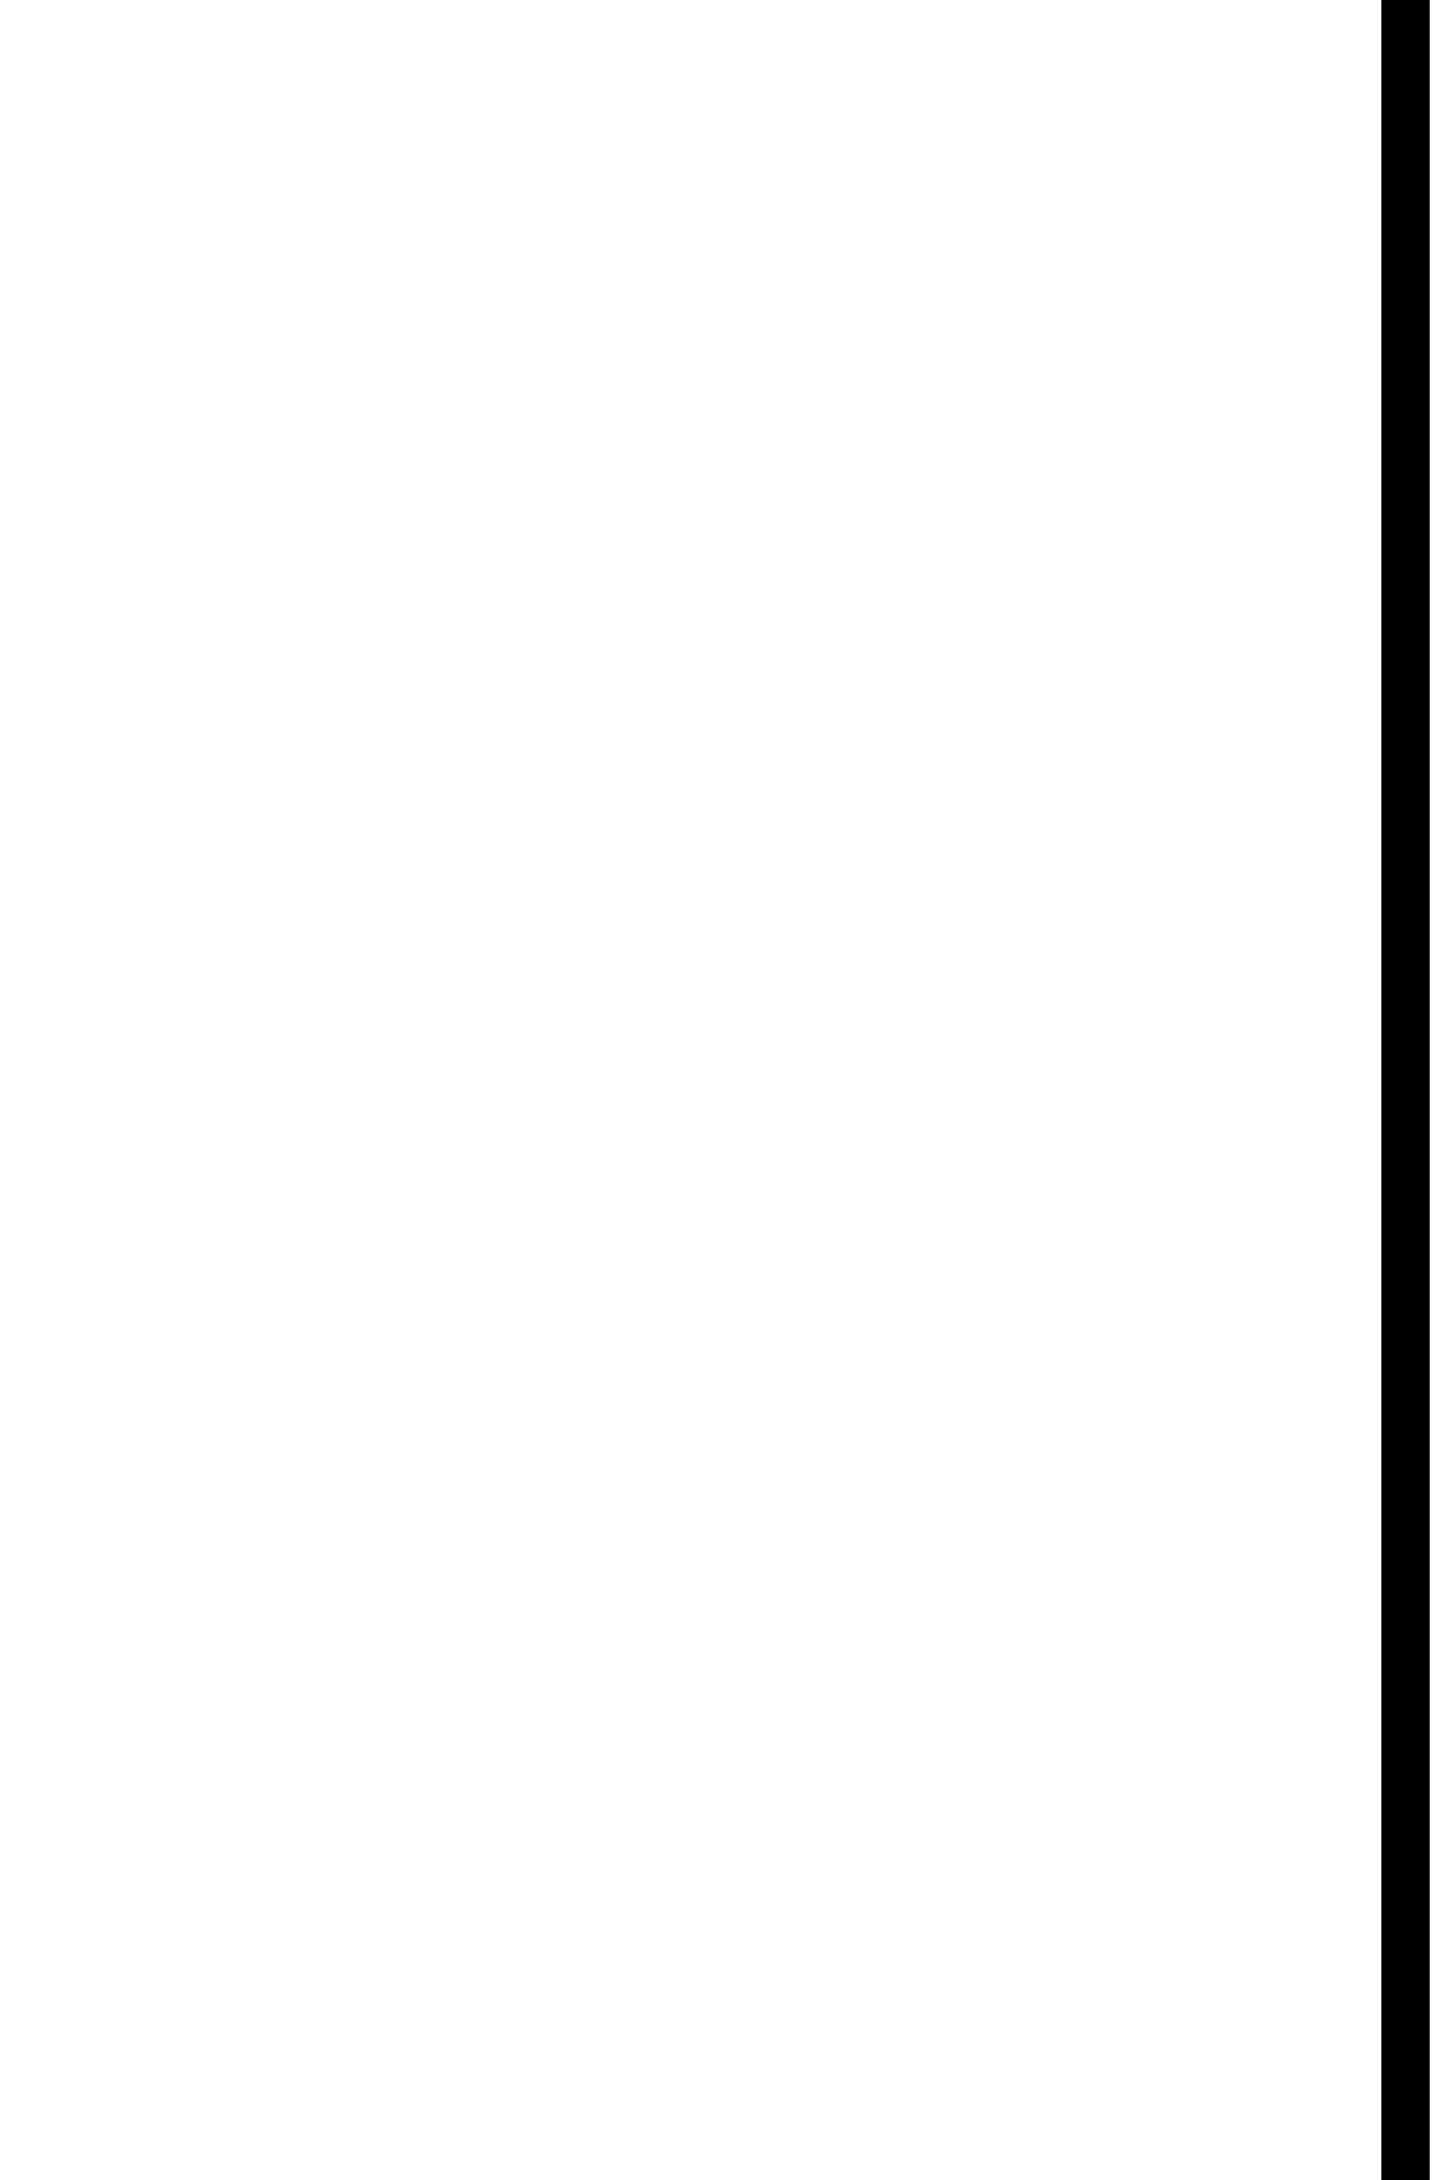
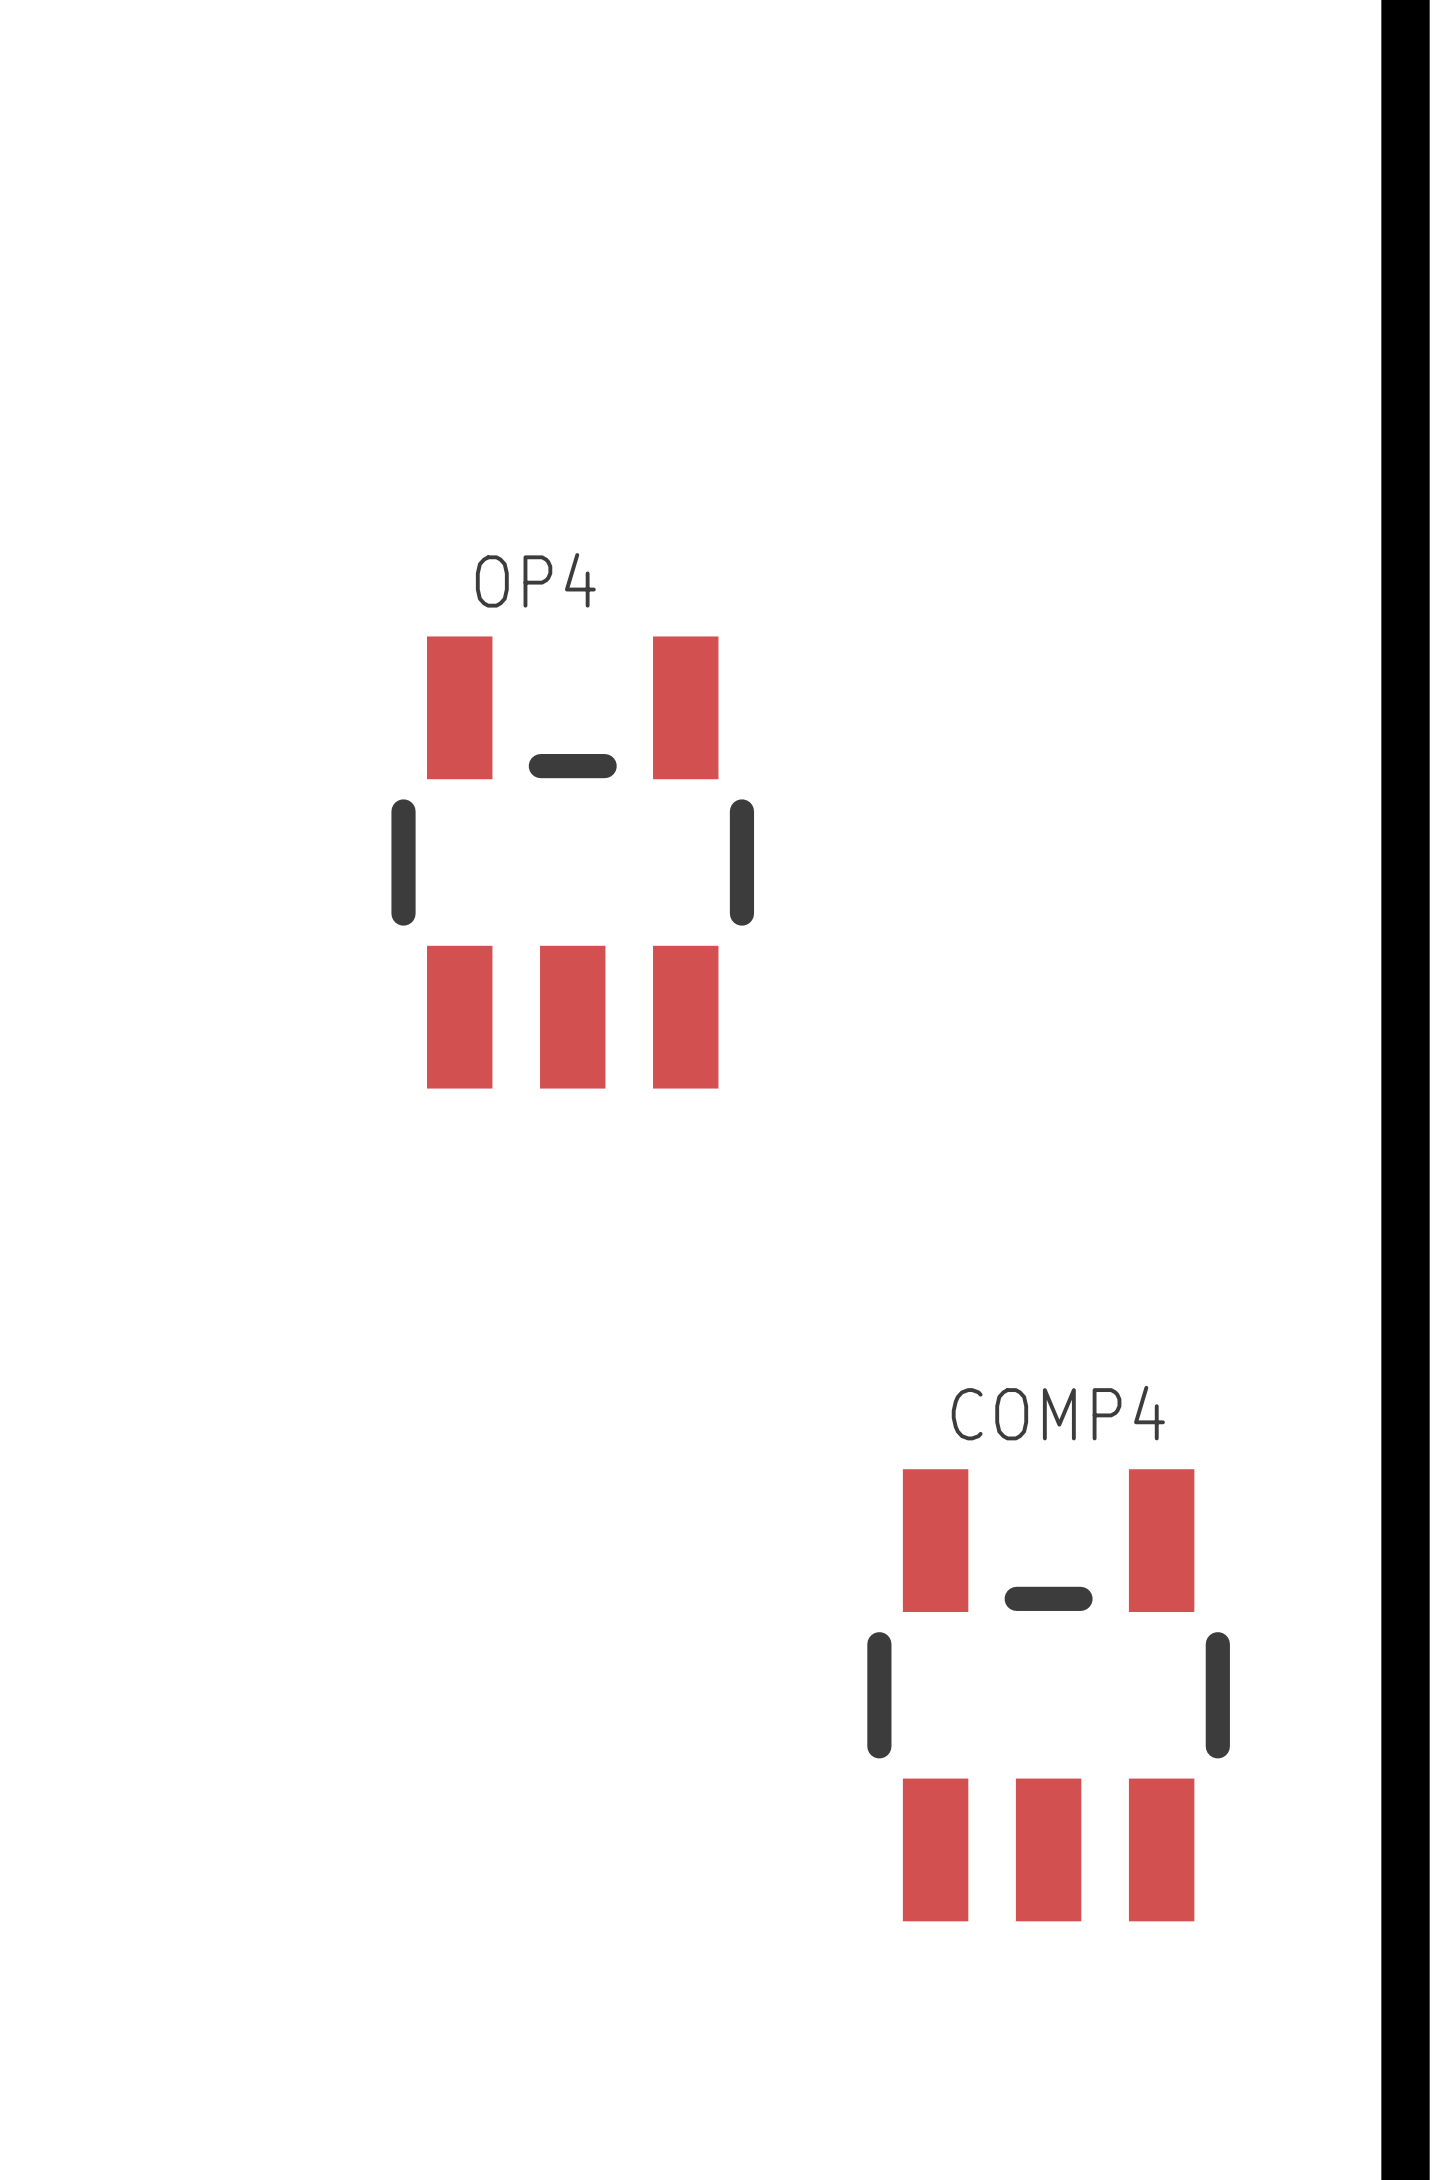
OP4: none -> (572, 862)
COMP4: none -> (1048, 1695)

